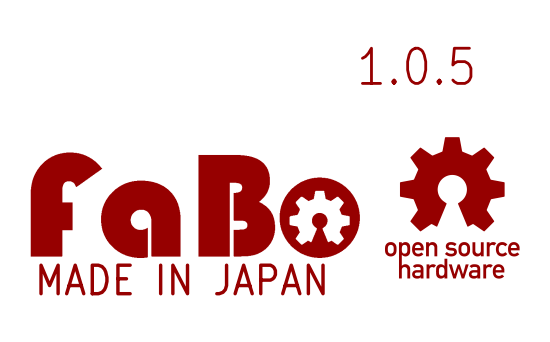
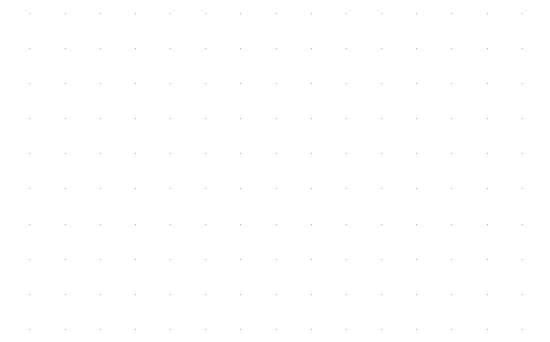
text: 1.0.5 (416, 65) -> none
part: (195, 205) -> none
part: (452, 207) -> none

